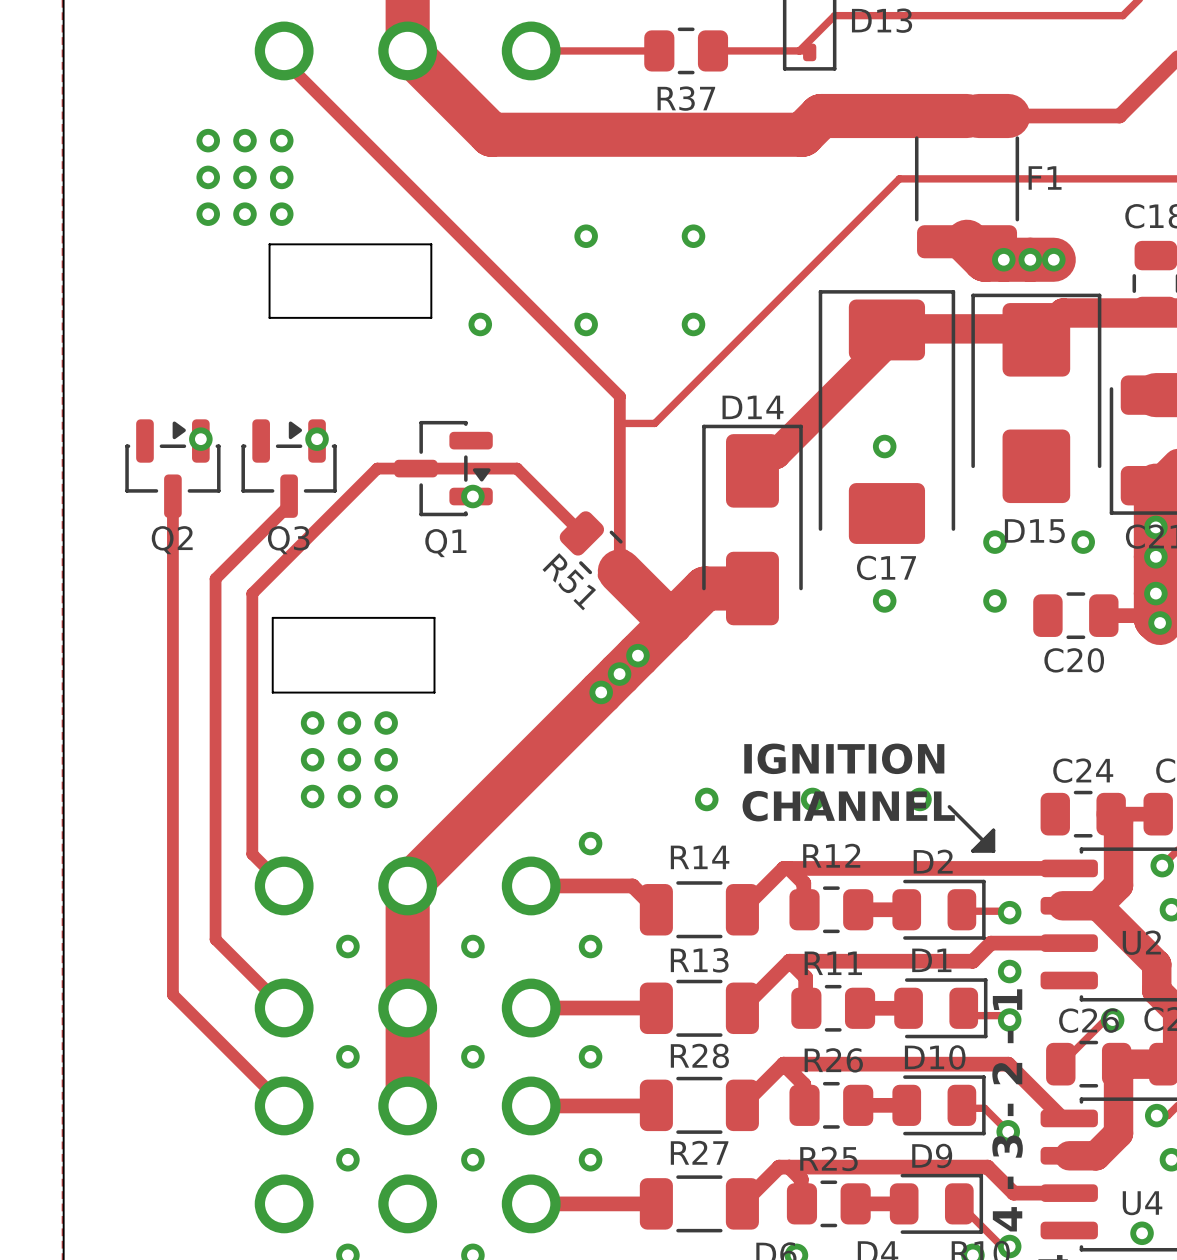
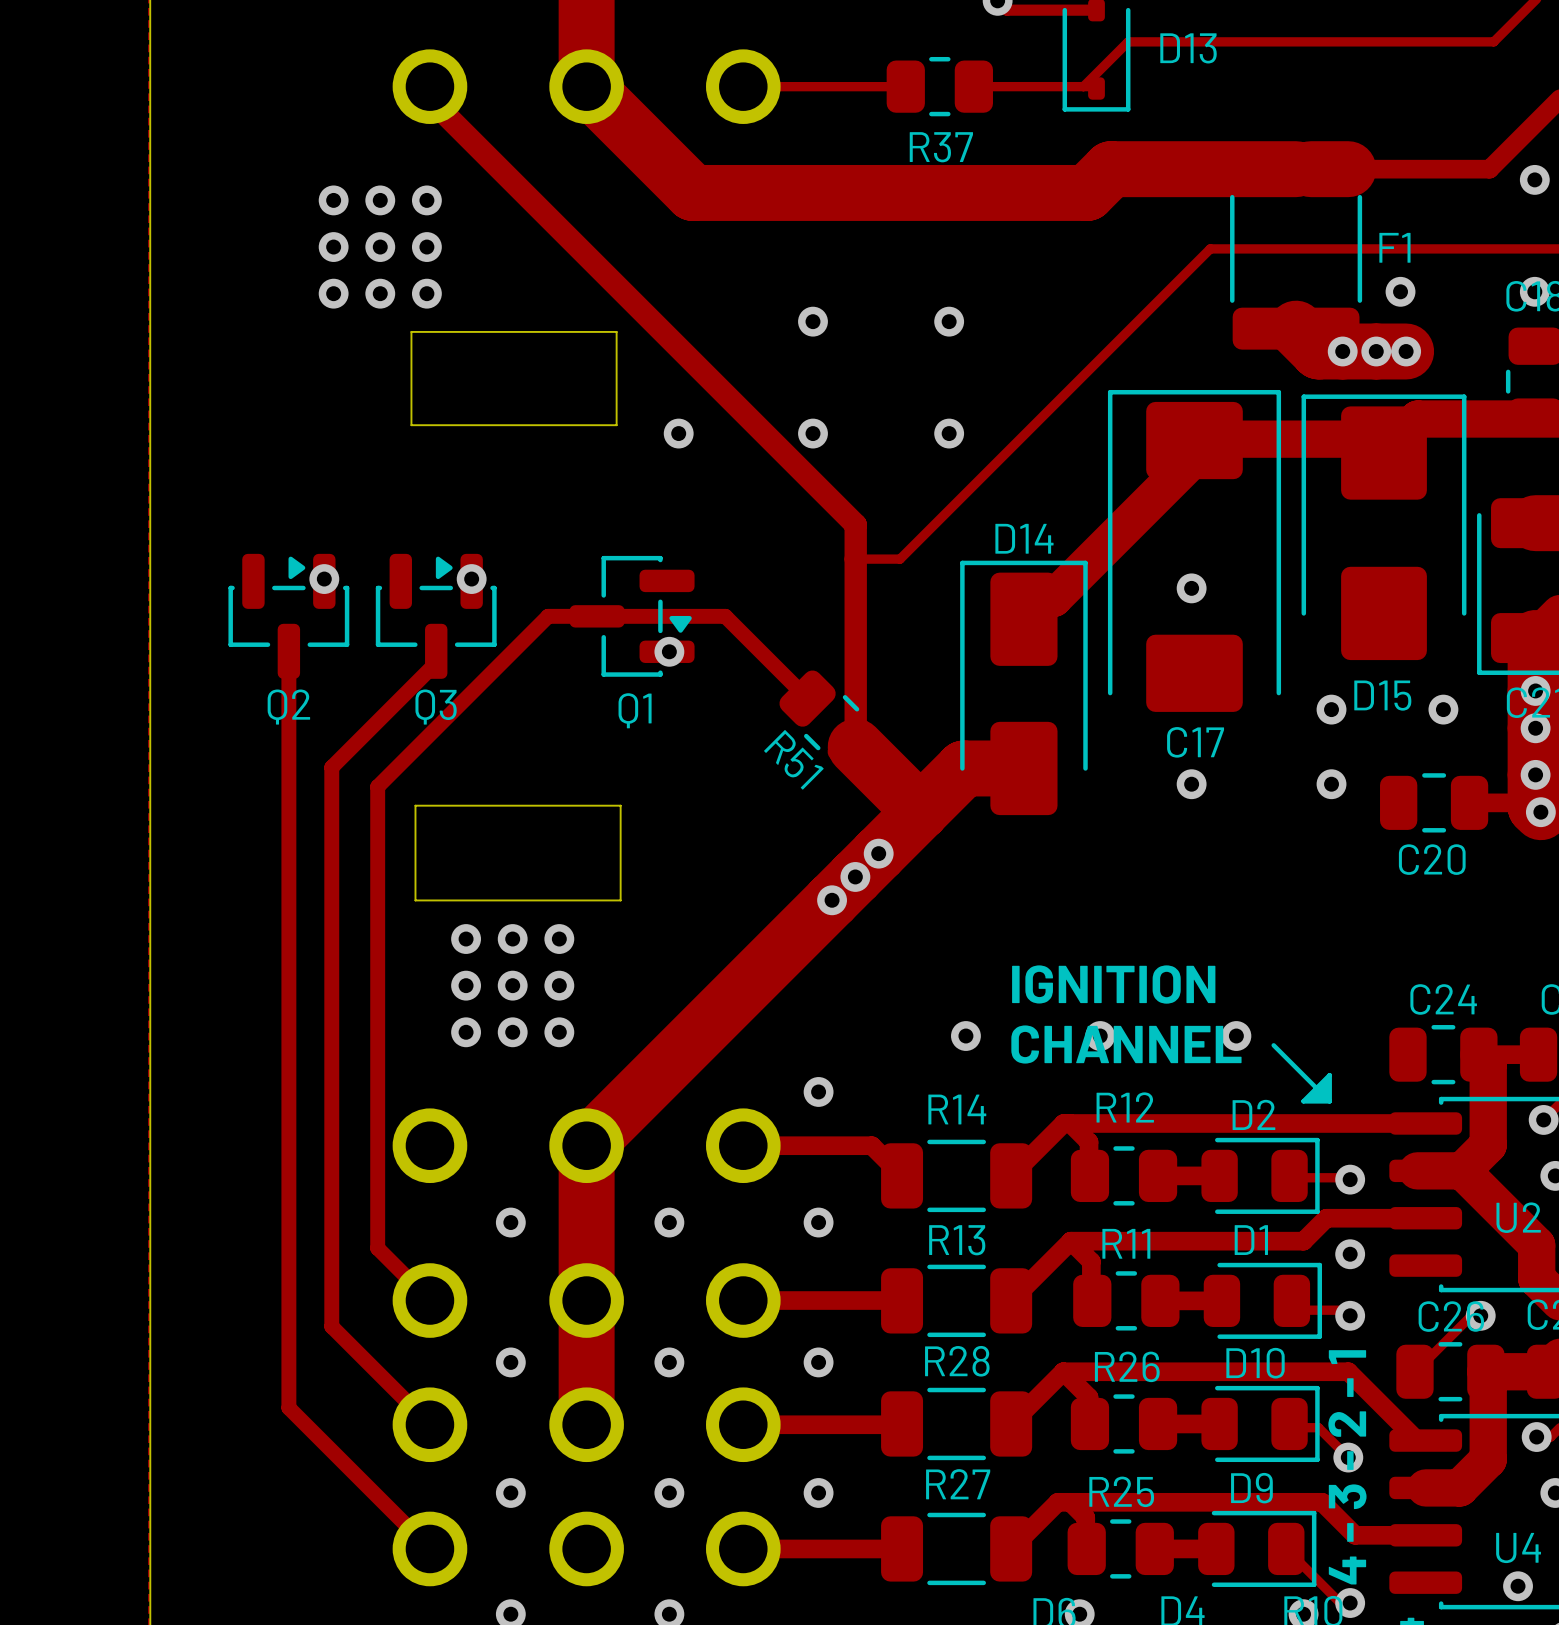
track width: thin (284, 50) (284, 60) (619, 396) (619, 571) -> thick (429, 86) (429, 99) (855, 524) (855, 746)
via: none -> (1534, 179)
via: none -> (1400, 291)
via: none -> (1534, 291)
track: (215, 578) (215, 939) (242, 966) -> (389, 774) (377, 786) (377, 1248)
track: none -> (342, 756) (331, 767) (331, 1326)
track: (252, 593) (252, 854) (284, 885) -> none
track: (172, 994) (206, 1028) -> (288, 1283) (288, 1407) (429, 1548)

